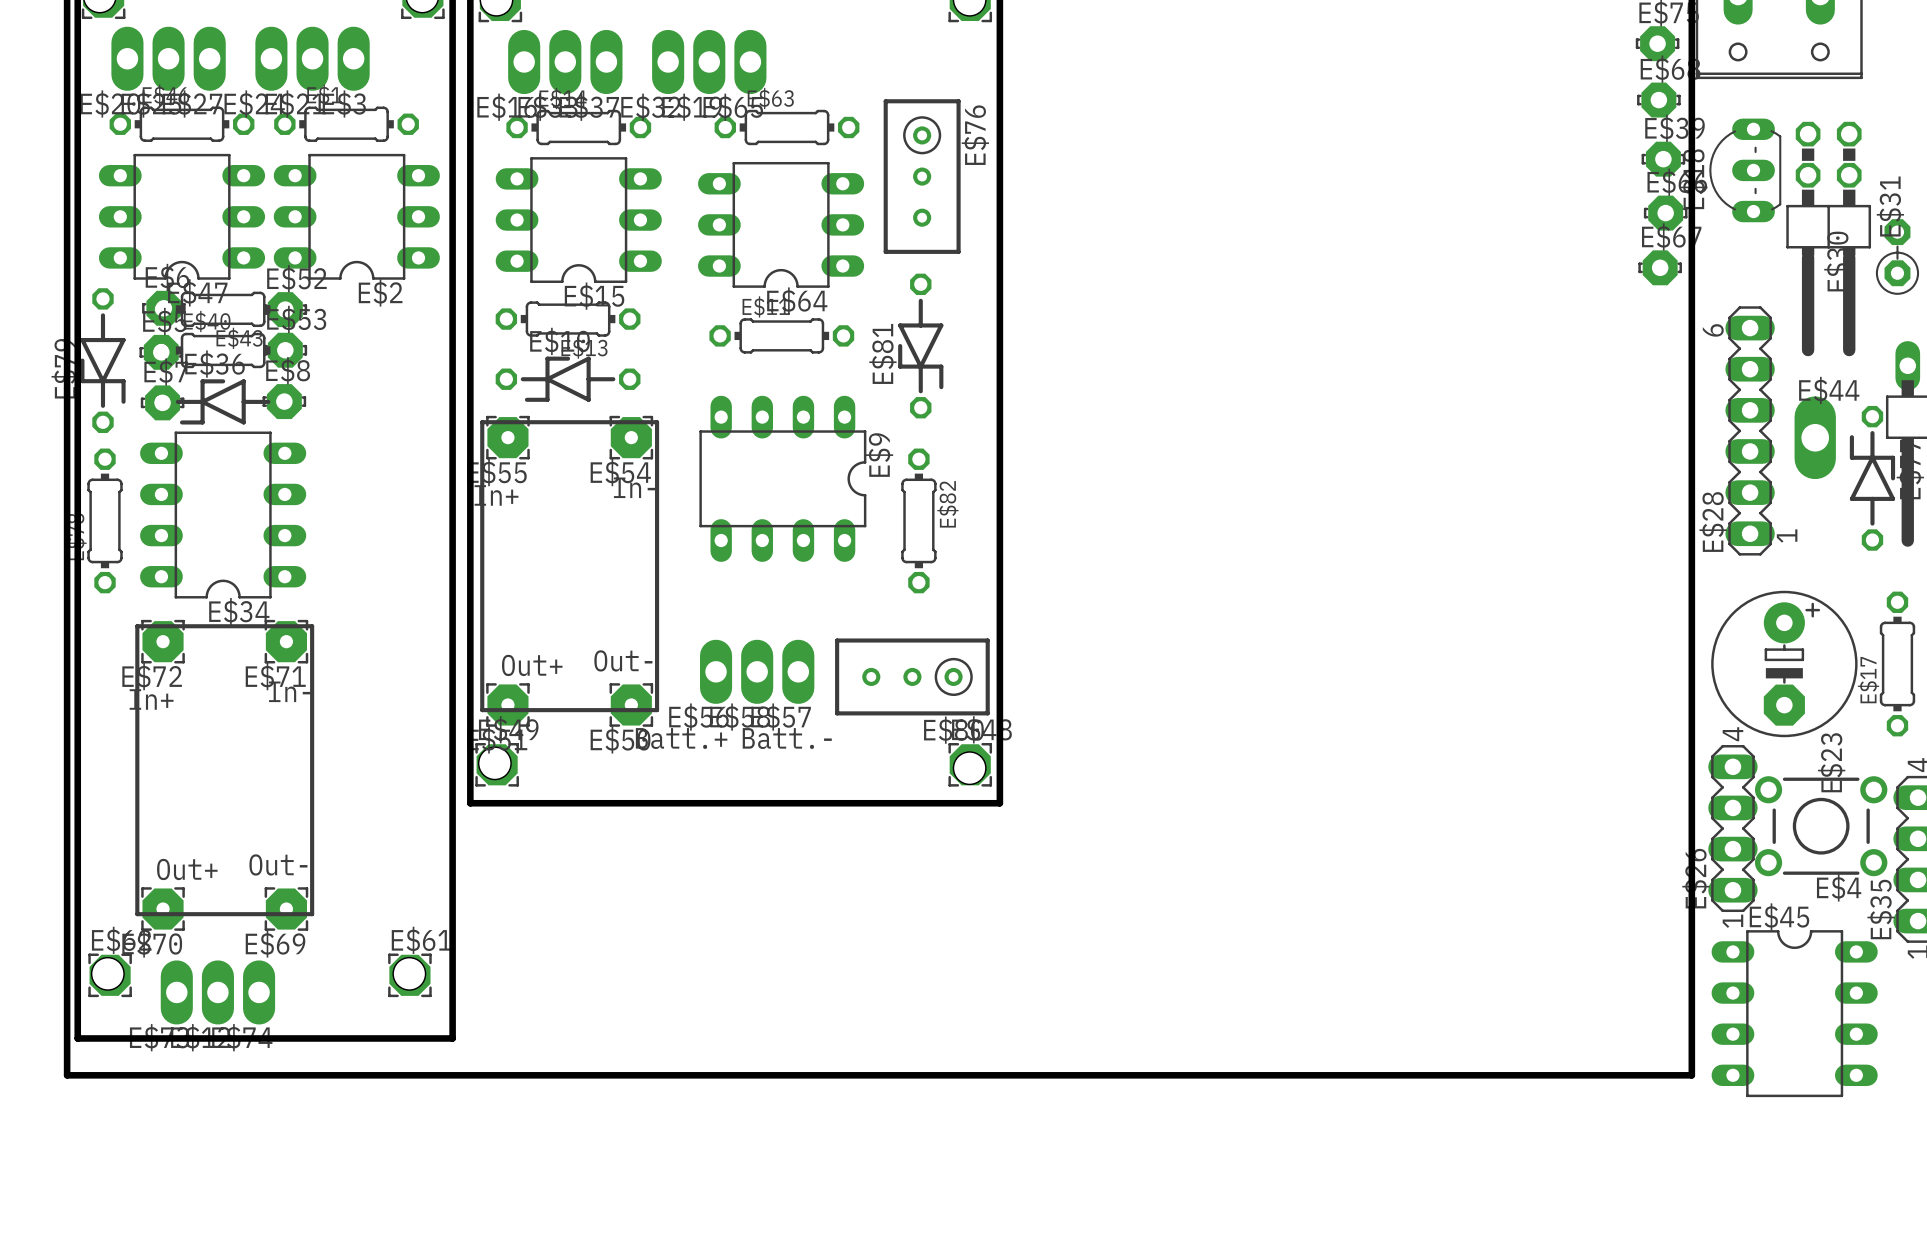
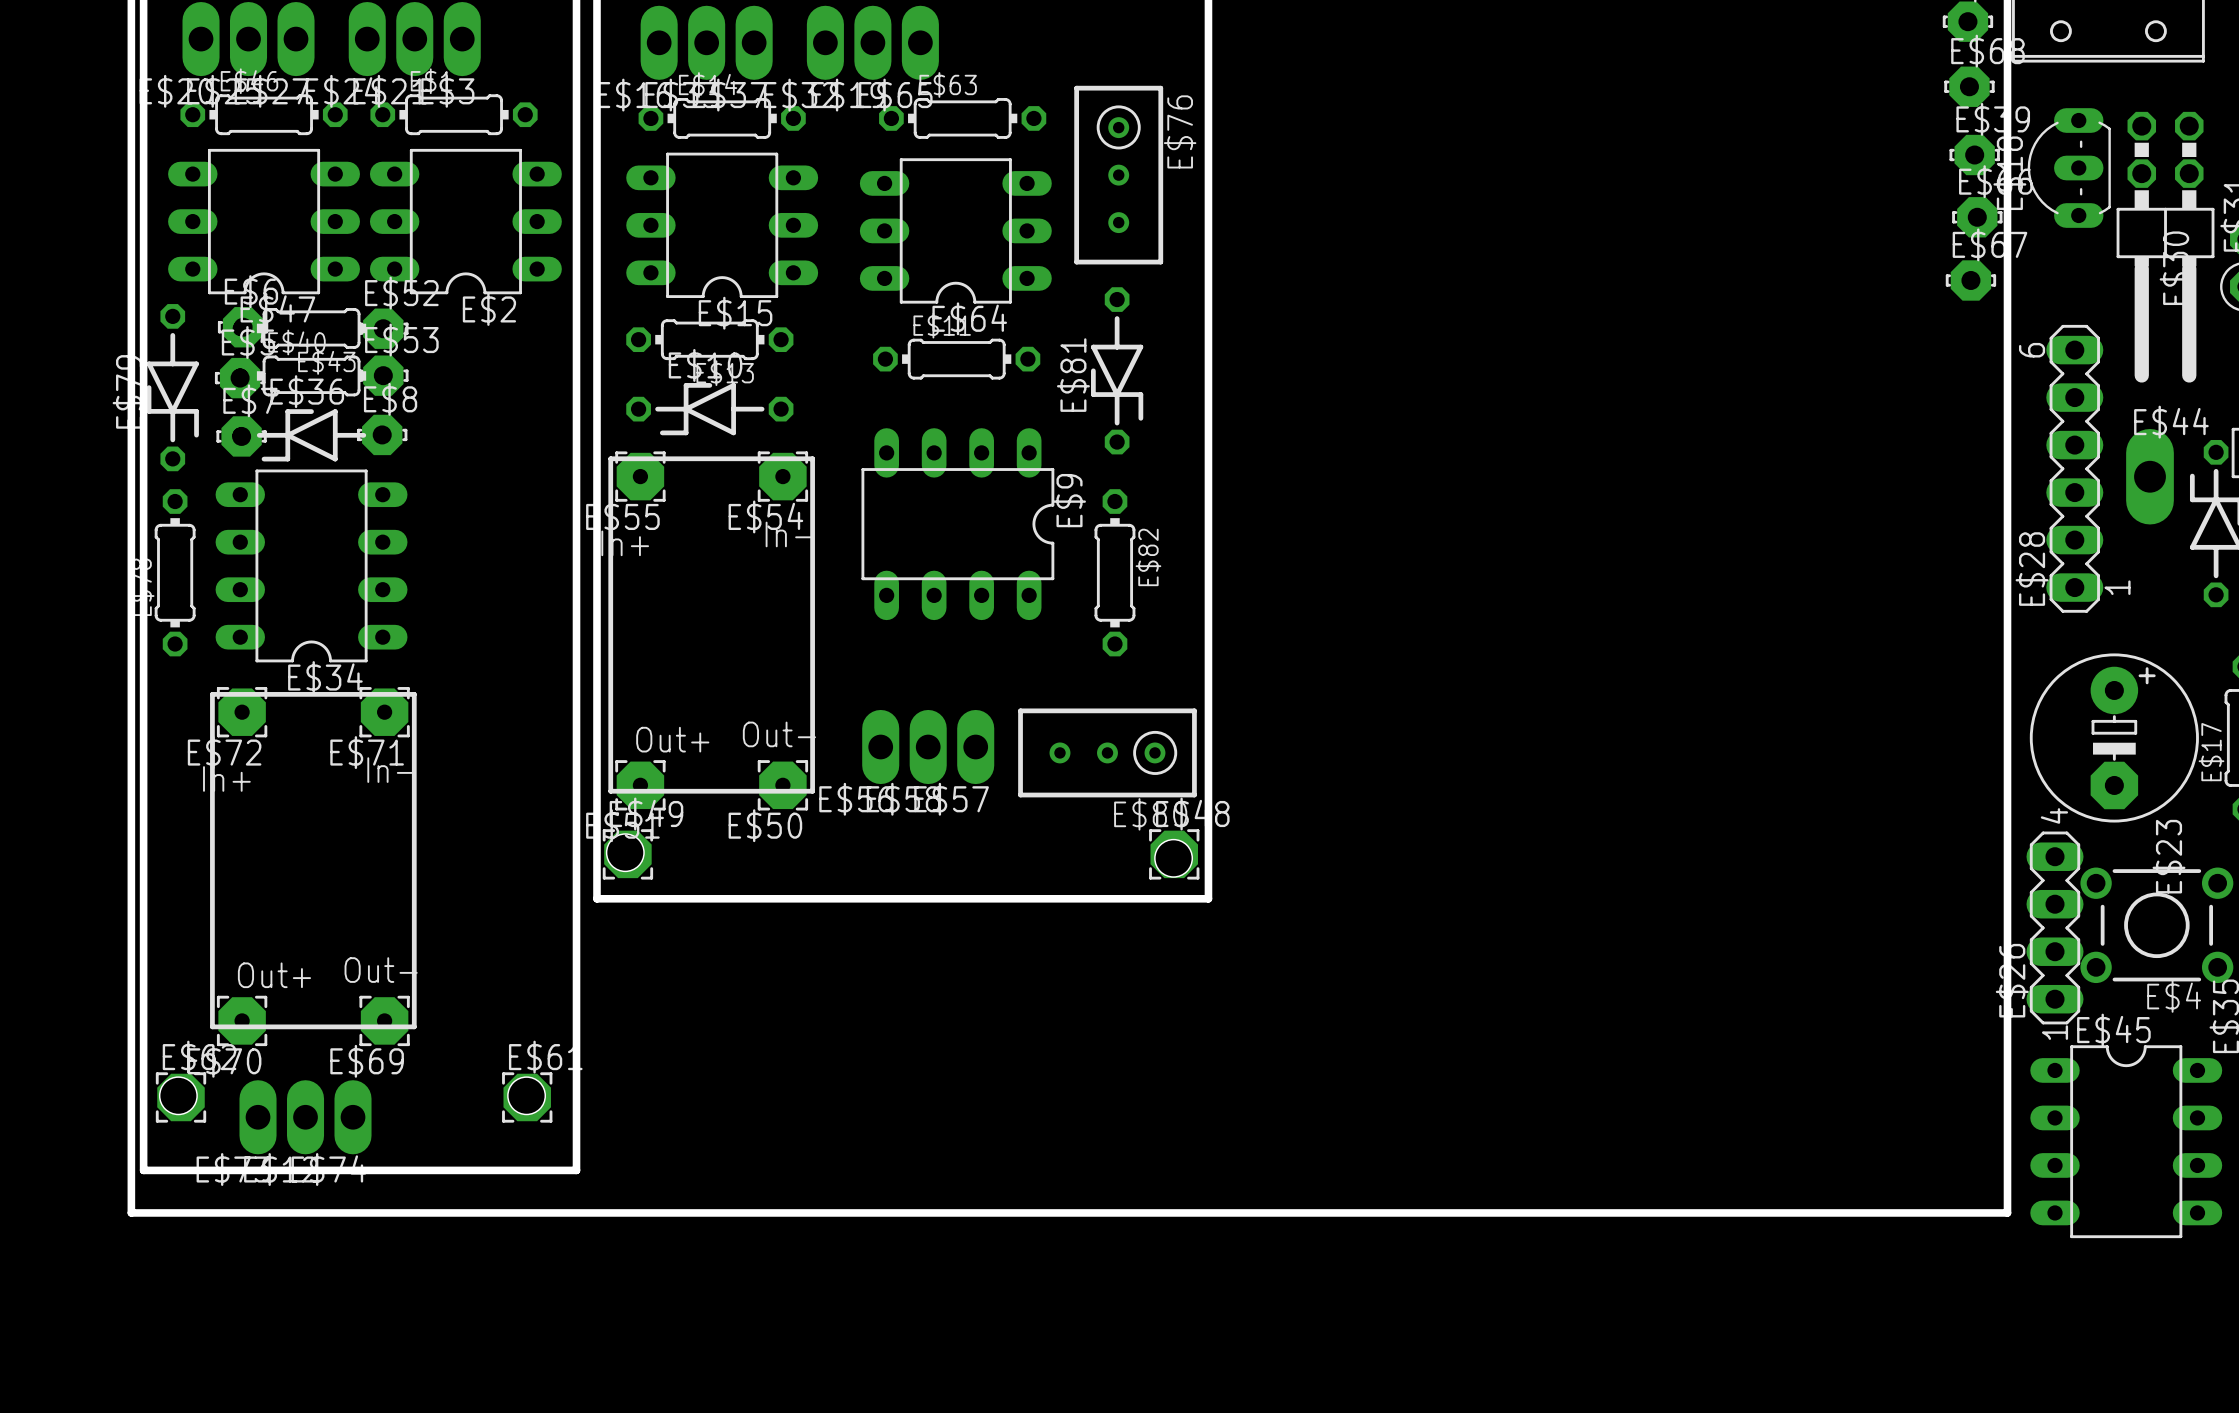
text: Batt.+ (681, 738) -> none
text: Batt.- (787, 738) -> none

